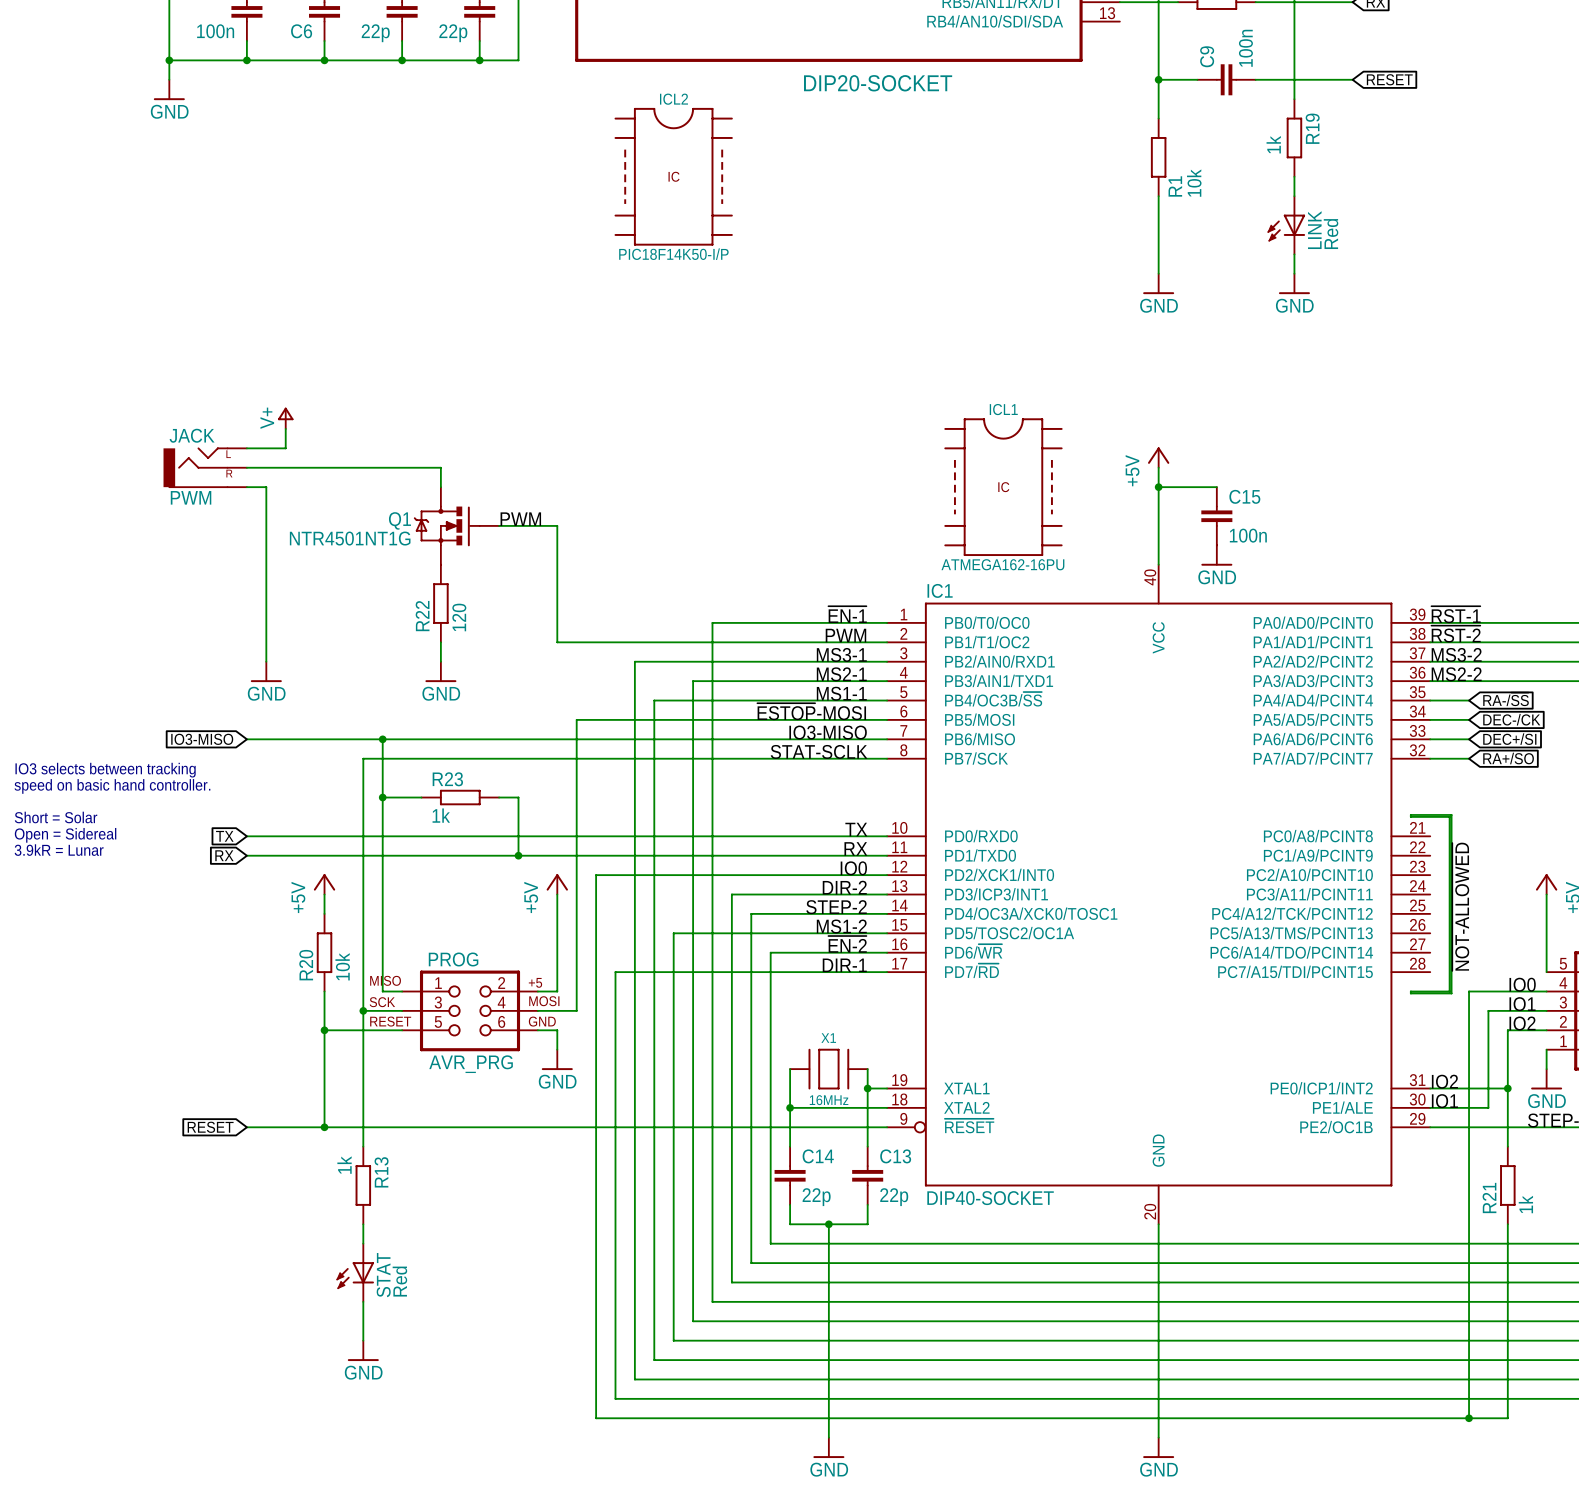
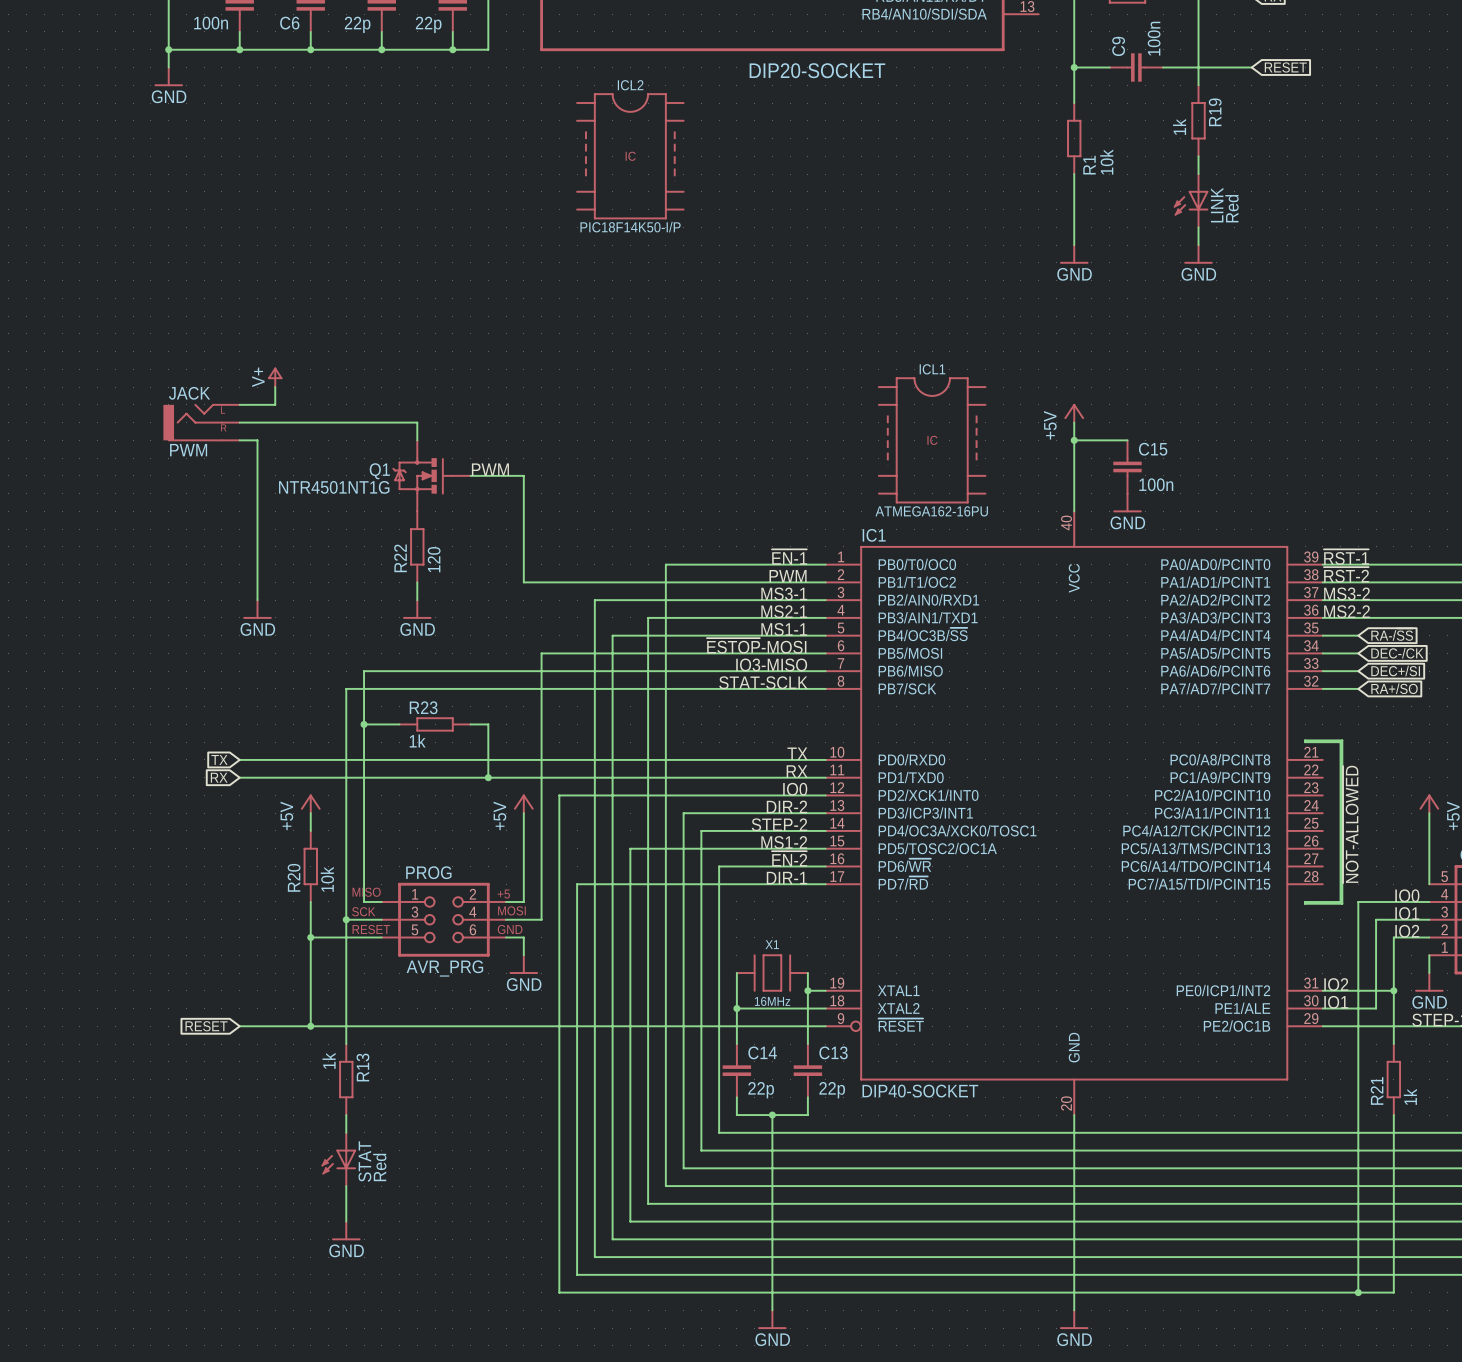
global label: IO3-MISO (202, 739) -> none
wire: (246, 739) (382, 739) -> none
junction: (382, 739) -> none
text: IO3 selects between tracking (105, 770) -> none
text: speed on basic hand controller. (112, 786) -> none
text: Short = Solar (56, 817) -> none
text: Open = Sidereal (65, 835) -> none
text: 3.9kR = Lunar (59, 850) -> none

